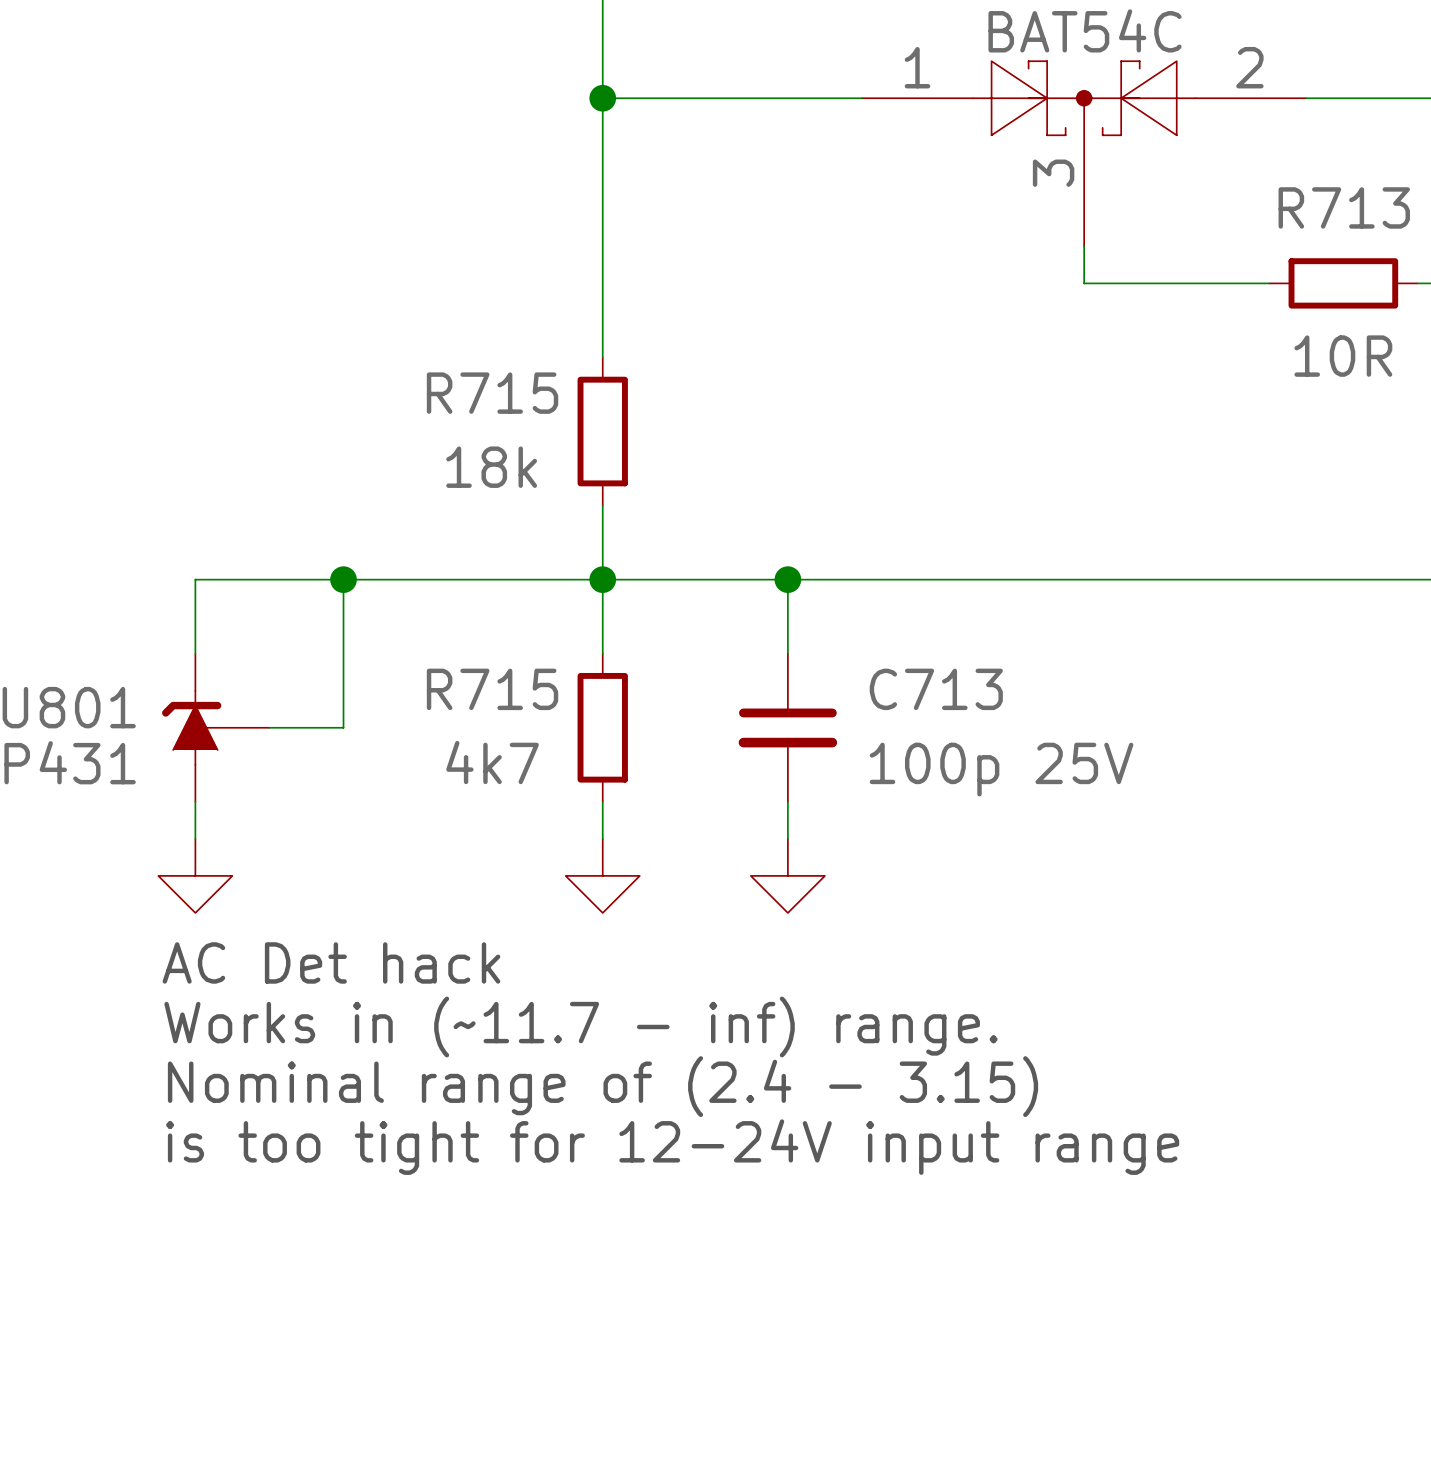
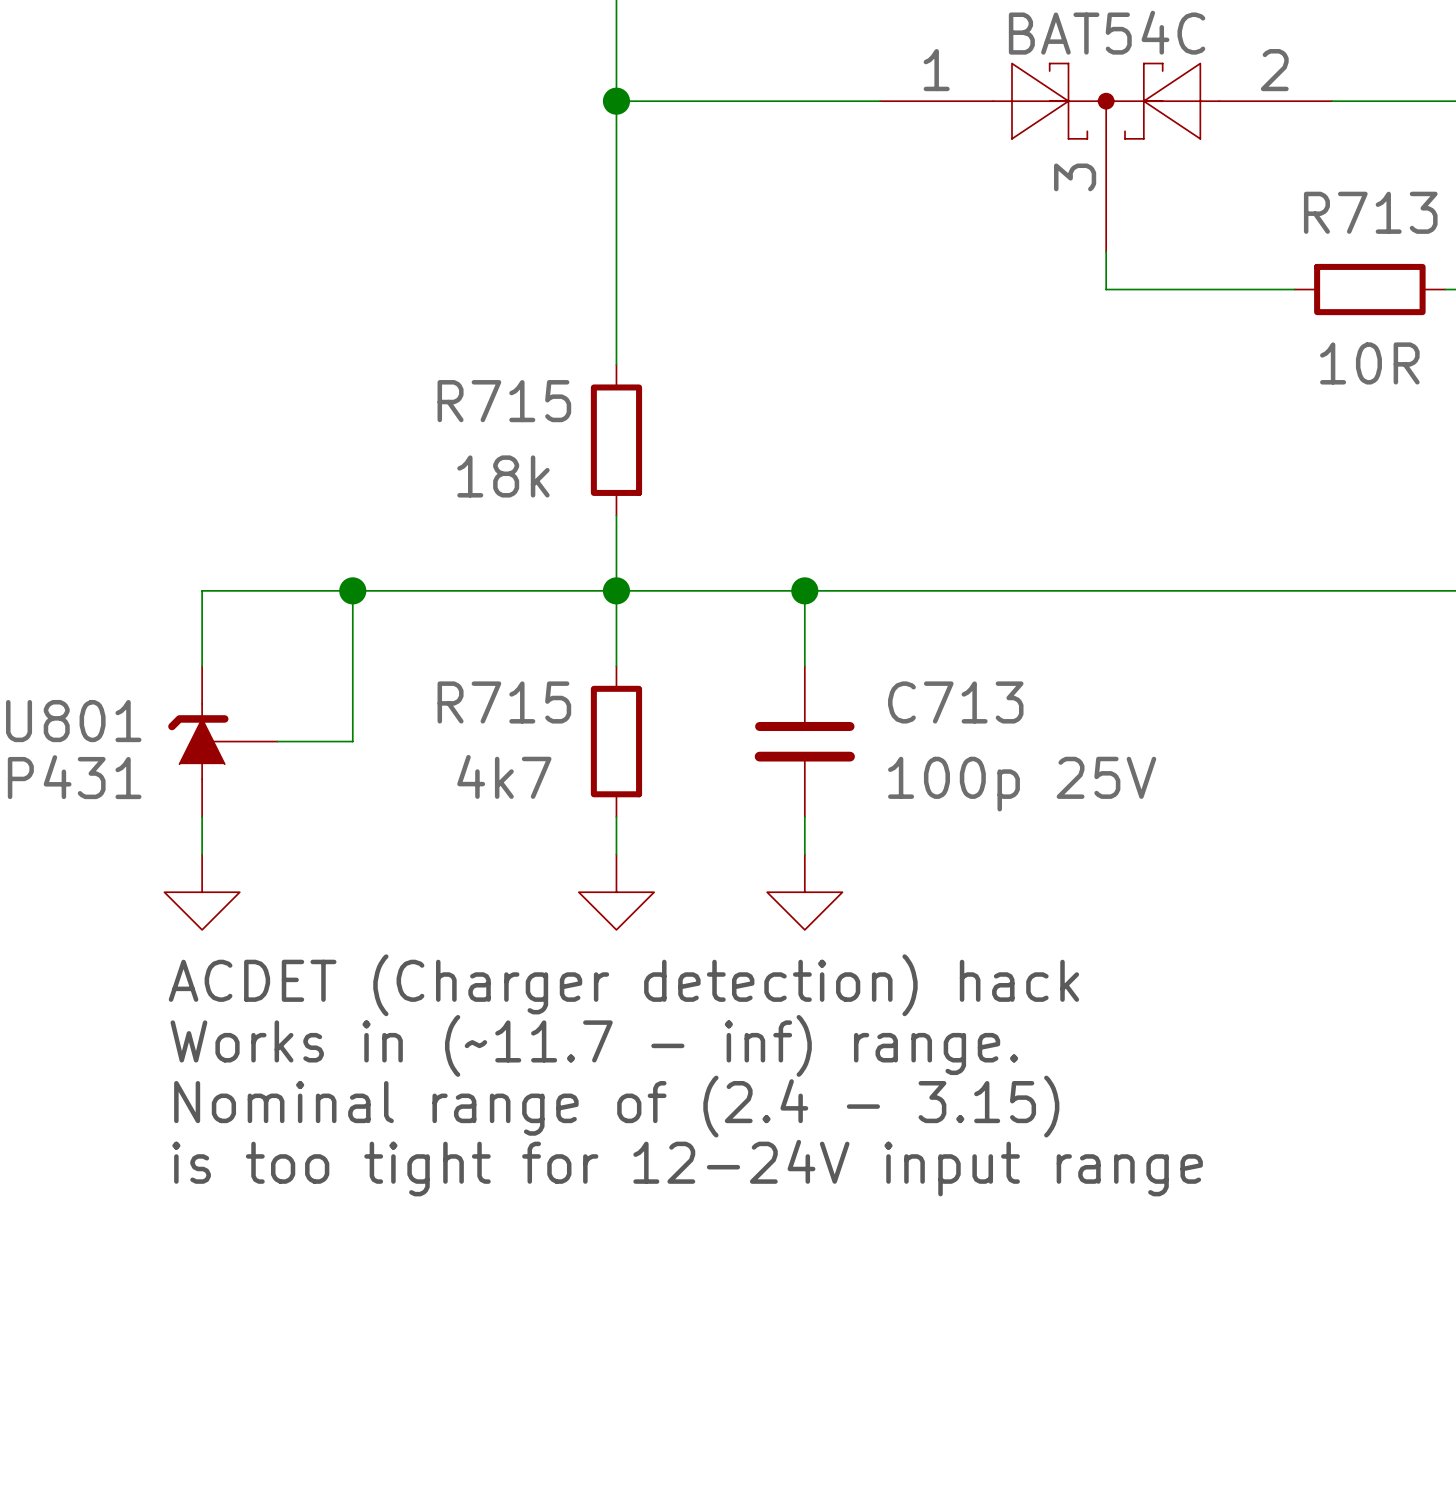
text: AC Det hack (331, 962) -> ACDET (Charger detection) hack (623, 985)

